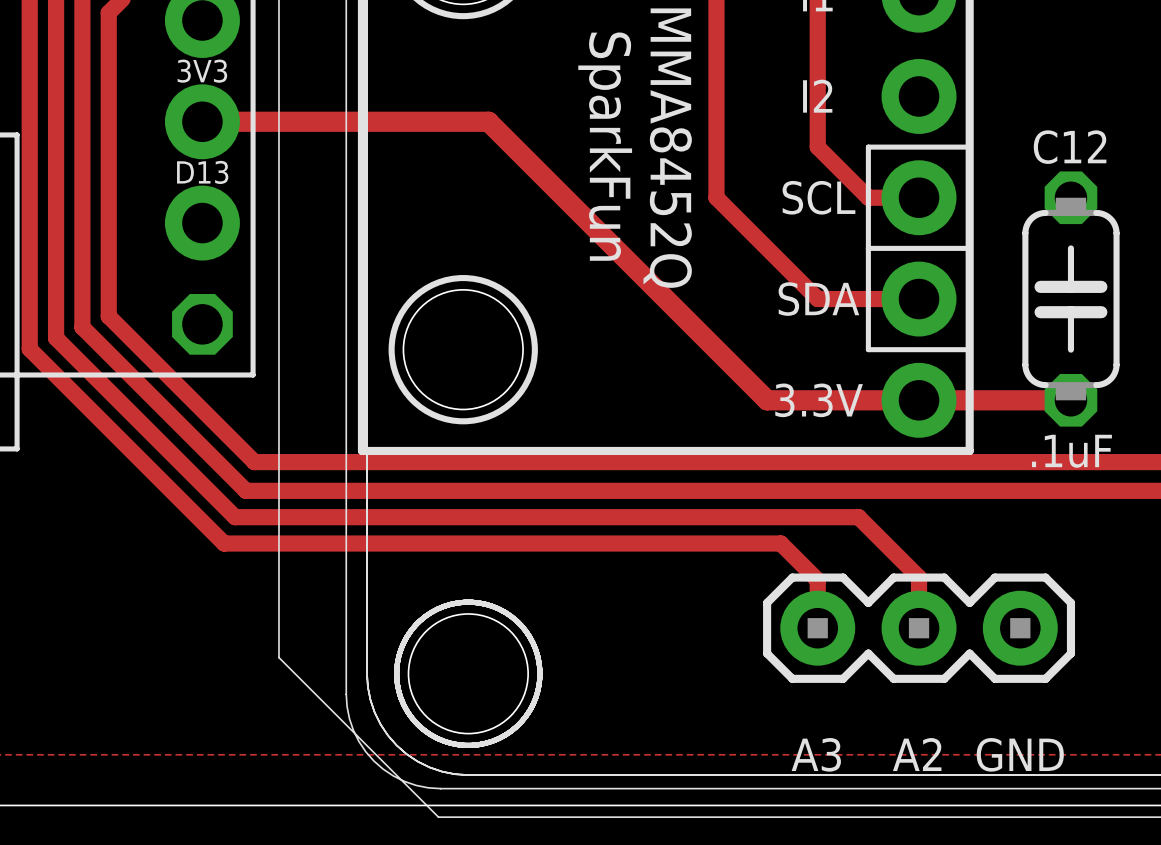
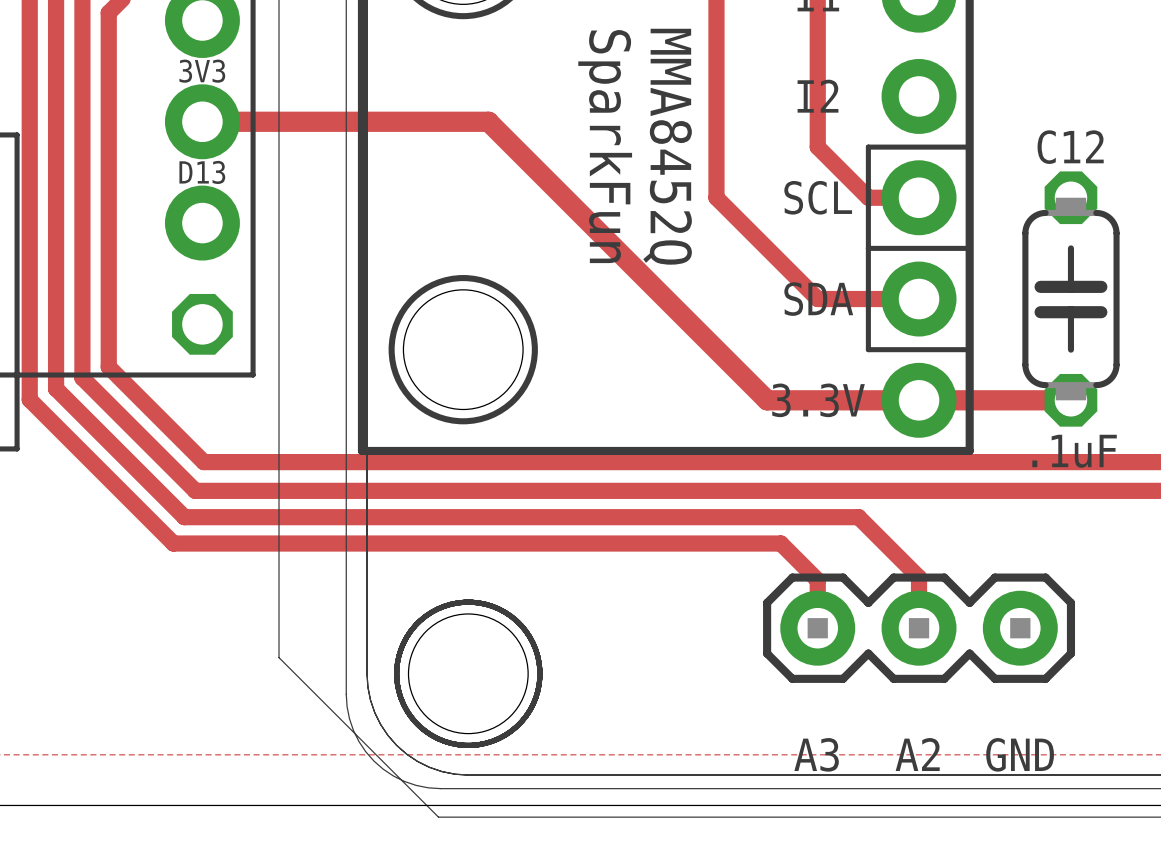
track: (108, 316) (254, 462) -> (108, 316) (108, 367) (203, 462) (254, 462)
track: (82, 327) (245, 490) -> (82, 327) (82, 377) (195, 490) (245, 490)
track: (56, 338) (235, 517) -> (56, 338) (56, 388) (184, 517) (235, 517)
track: (29, 349) (224, 543) -> (29, 349) (29, 399) (173, 543) (224, 543)

